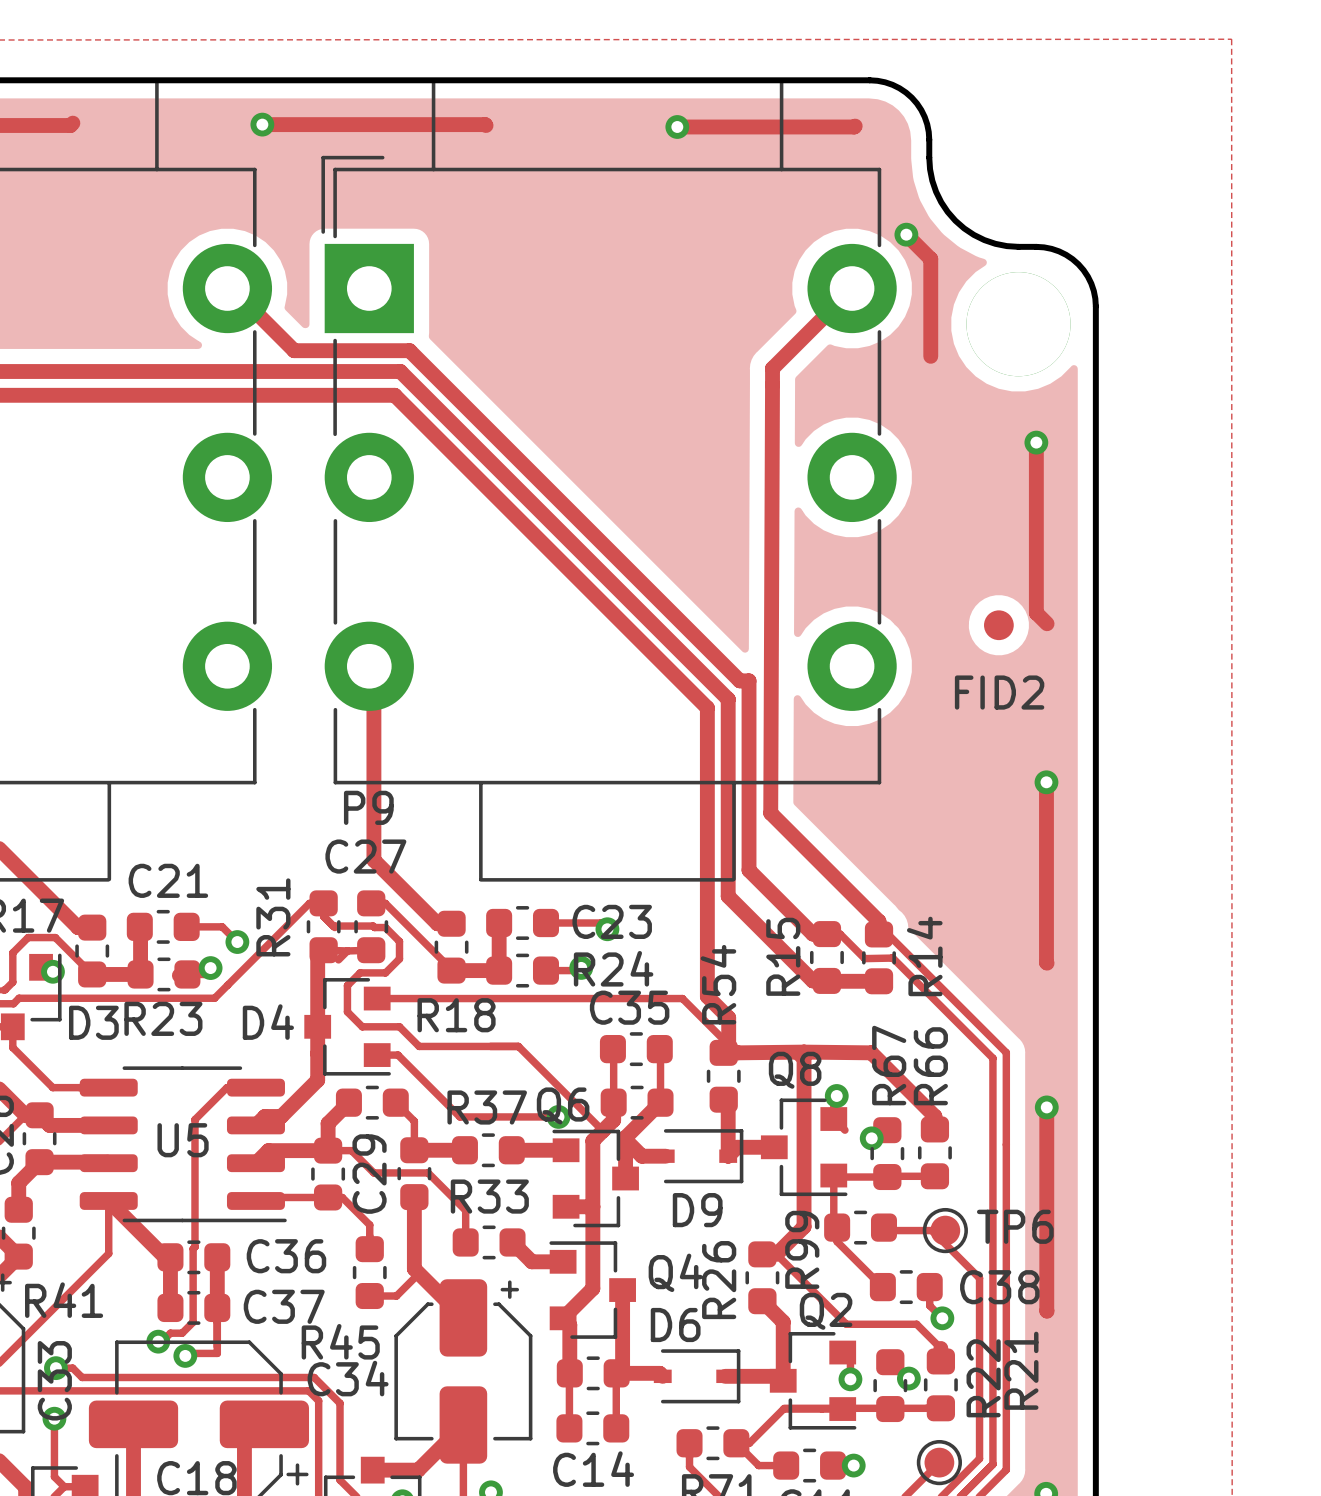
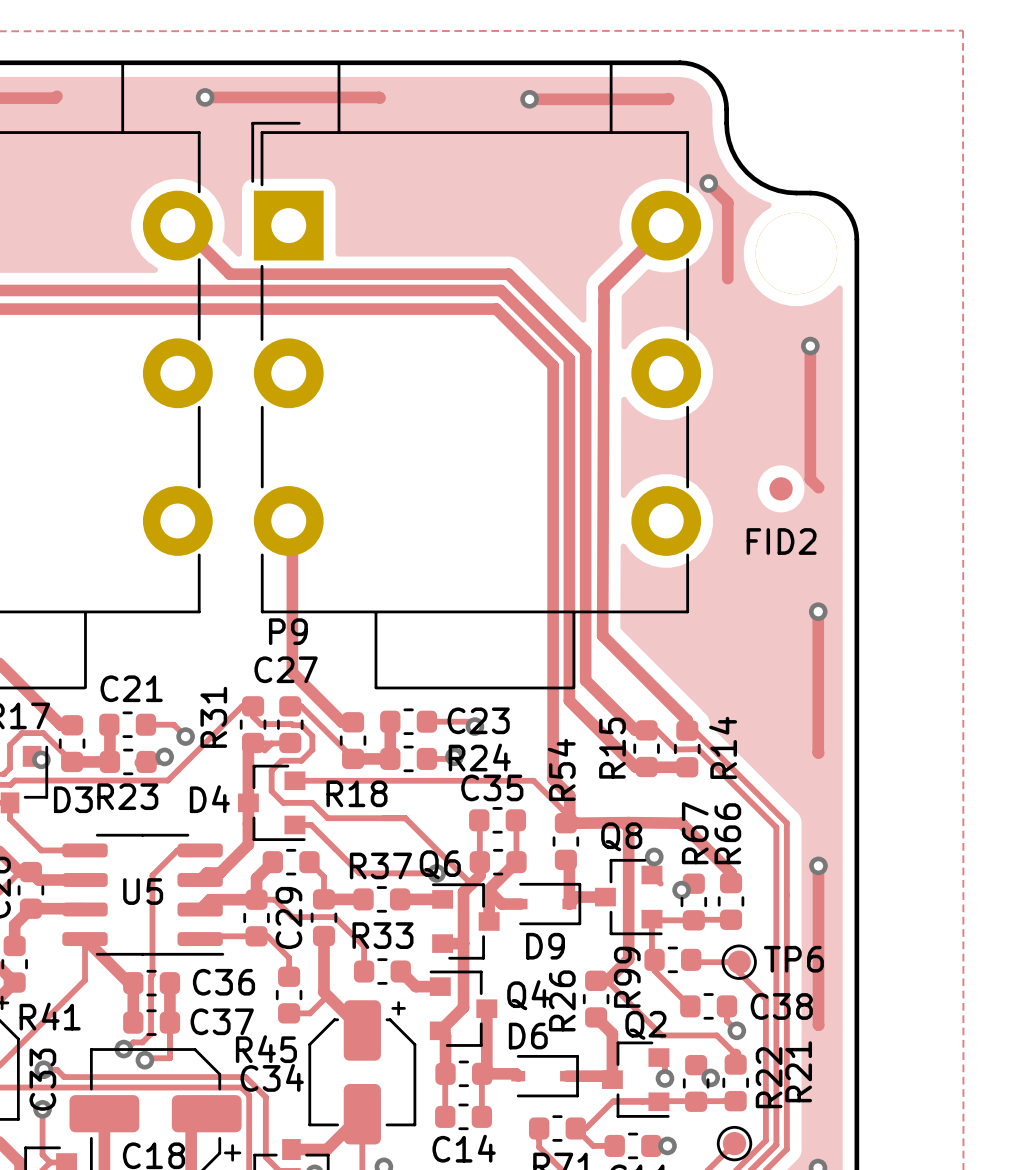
track: (409, 350) (739, 680) (749, 680) -> (320, 274) (508, 274) (585, 351) (585, 532)
track: (400, 371) (728, 699) -> (313, 290) (500, 290) (569, 359) (569, 546)
track: (394, 395) (707, 707) -> (308, 309) (496, 309) (553, 365) (553, 553)

